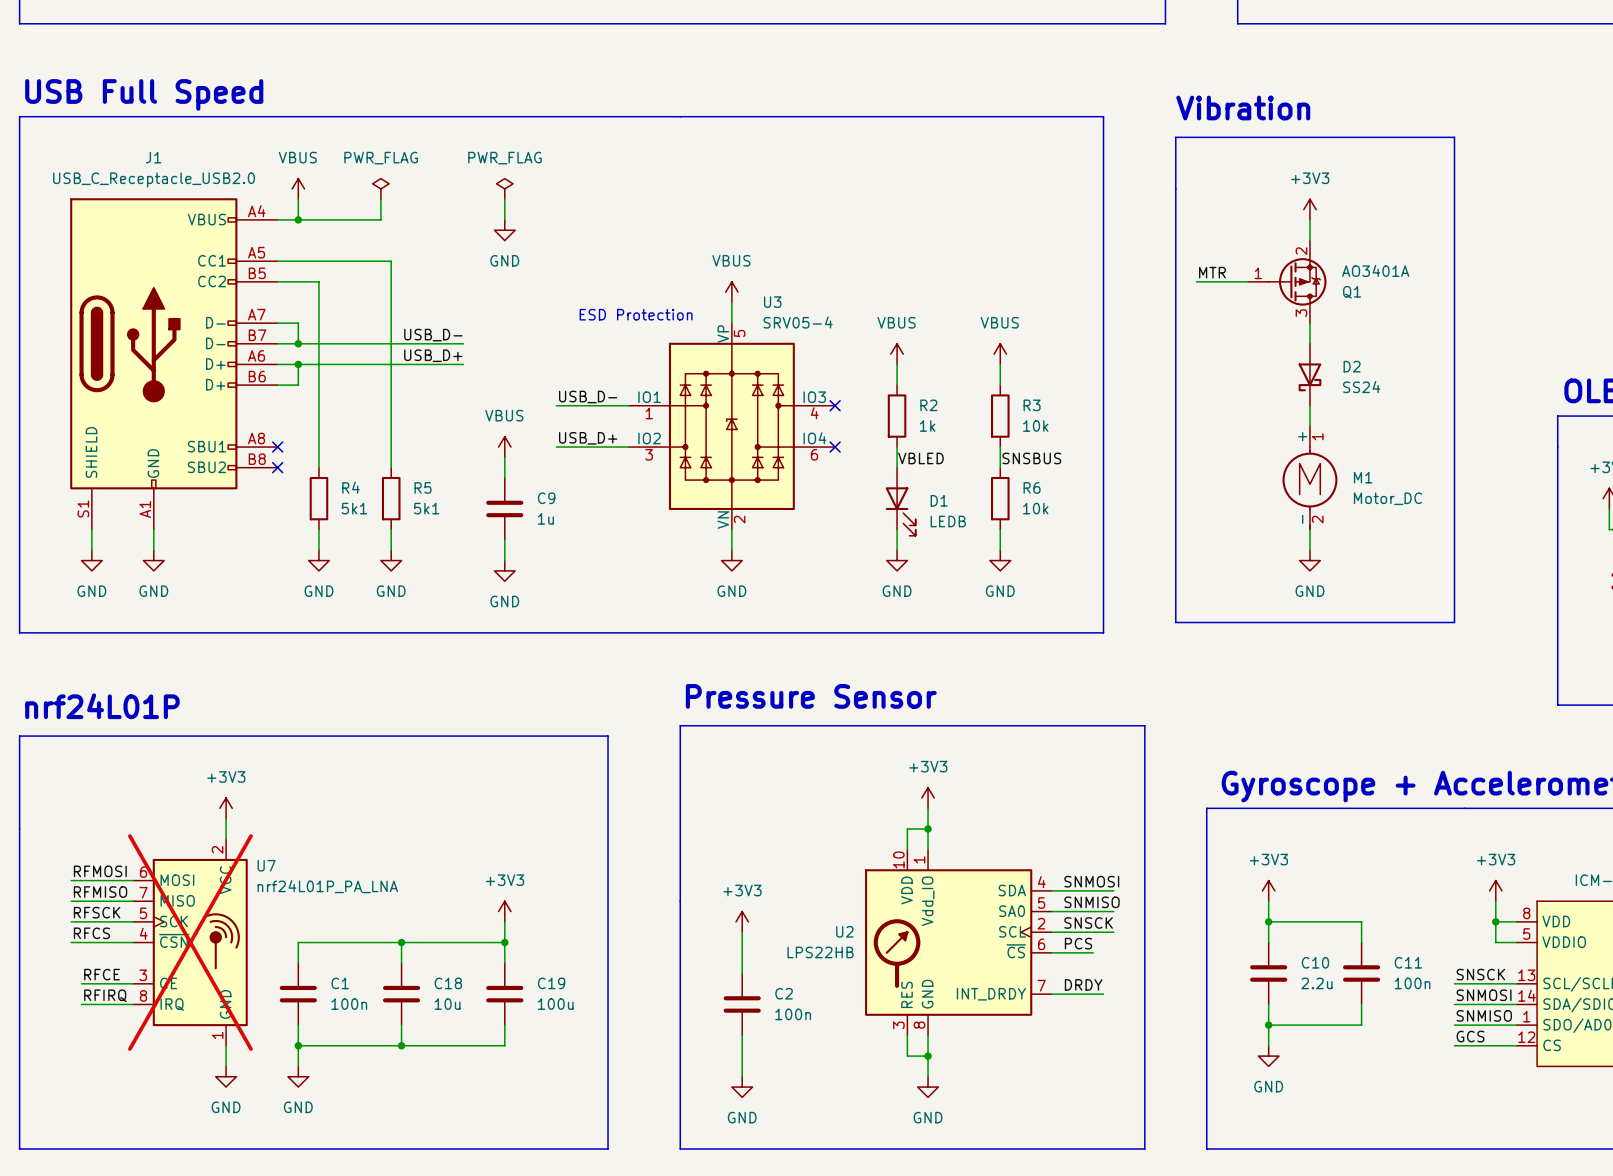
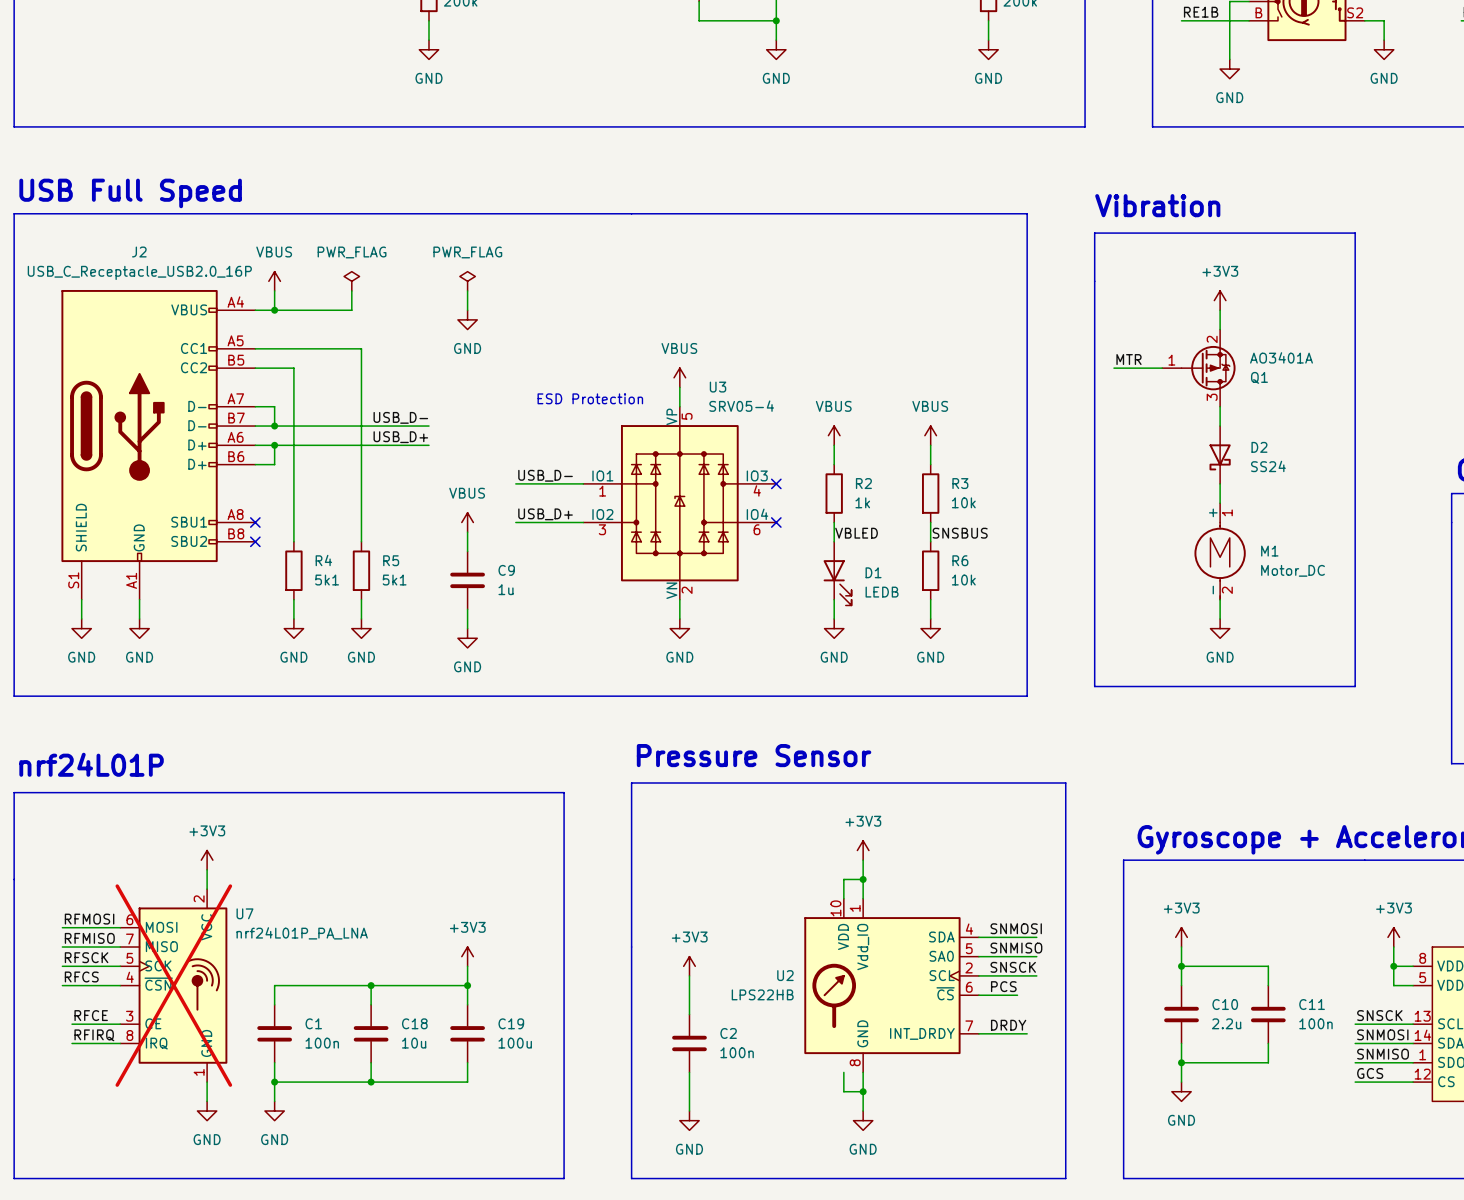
J1 name: J1 (153, 157) -> J2 (139, 252)
J1 value: USB_C_Receptacle_USB2.0 (154, 179) -> USB_C_Receptacle_USB2.0_16P (139, 272)
U2 symbol: [865, 849, 1052, 1036] -> [804, 898, 979, 1073]

